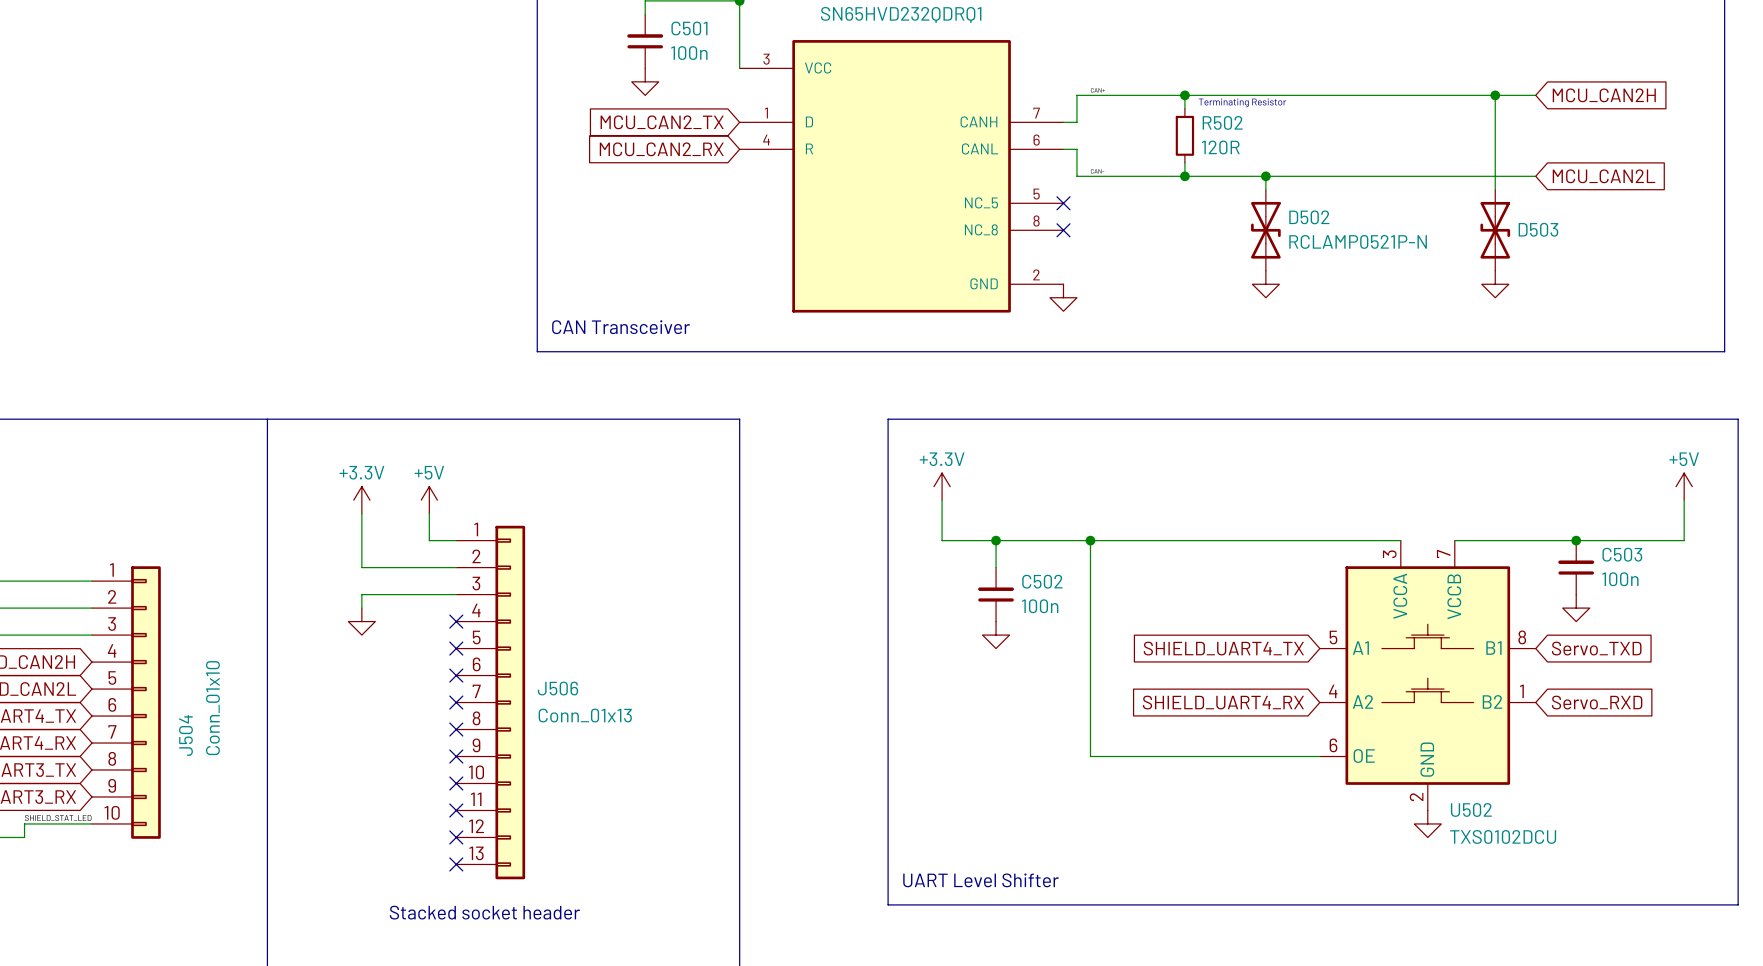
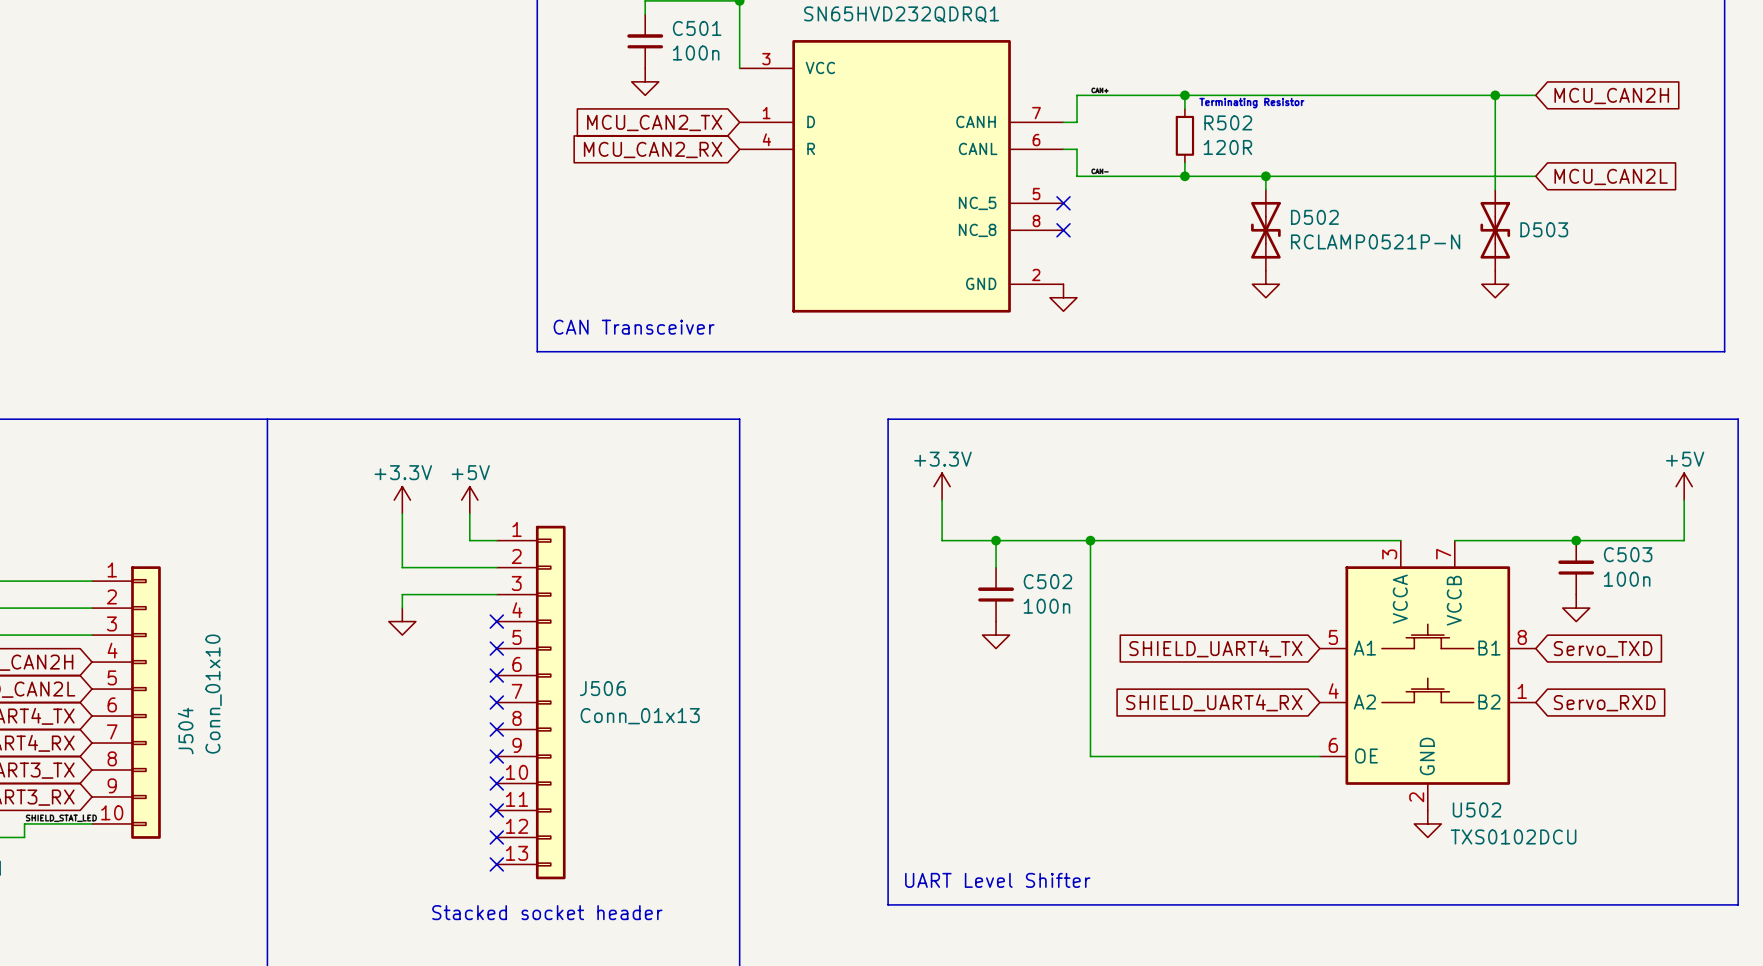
power symbol position: +3.3V (361, 500) -> +3.3V (402, 500)
power symbol position: +5V (429, 500) -> +5V (469, 500)
wire: (361, 513) (361, 567) (402, 567) -> (402, 513) (402, 567)
wire: (429, 513) (429, 540) (456, 540) -> (469, 513) (469, 540) (496, 540)
wire: (402, 594) (361, 594) (361, 608) -> (402, 594) (402, 608)
power symbol position: (361, 621) -> (402, 621)
no-connect mark: (456, 621) -> none
no-connect mark: none -> (496, 621)
no-connect mark: (456, 648) -> none
no-connect mark: none -> (496, 648)
no-connect mark: (456, 675) -> none
no-connect mark: none -> (496, 675)
no-connect mark: (456, 702) -> none
J506 position: (490, 702) -> (531, 702)
no-connect mark: none -> (496, 702)
no-connect mark: (456, 729) -> none
no-connect mark: none -> (496, 729)
no-connect mark: (456, 756) -> none
no-connect mark: none -> (496, 756)
no-connect mark: (456, 783) -> none
no-connect mark: none -> (496, 783)
no-connect mark: (456, 810) -> none
no-connect mark: none -> (496, 810)
no-connect mark: (456, 837) -> none
no-connect mark: none -> (496, 837)
no-connect mark: (456, 864) -> none
no-connect mark: none -> (496, 864)
text position: Stacked socket header (484, 912) -> Stacked socket header (547, 912)

